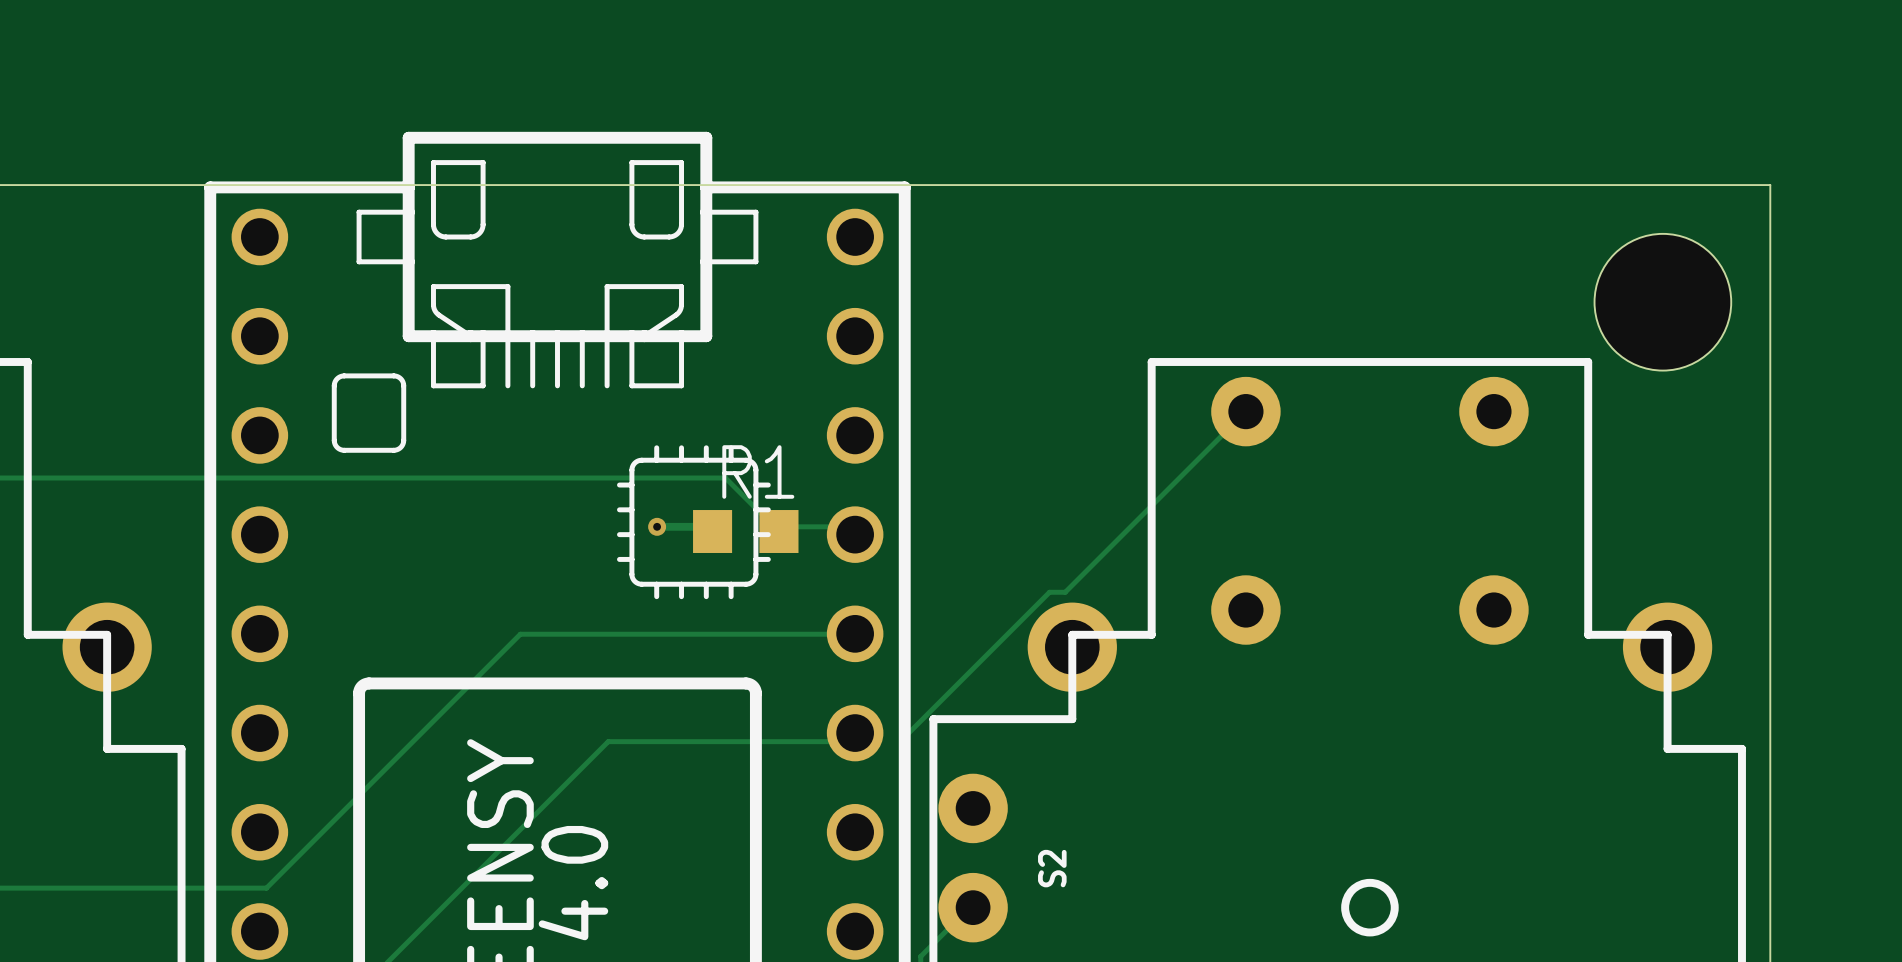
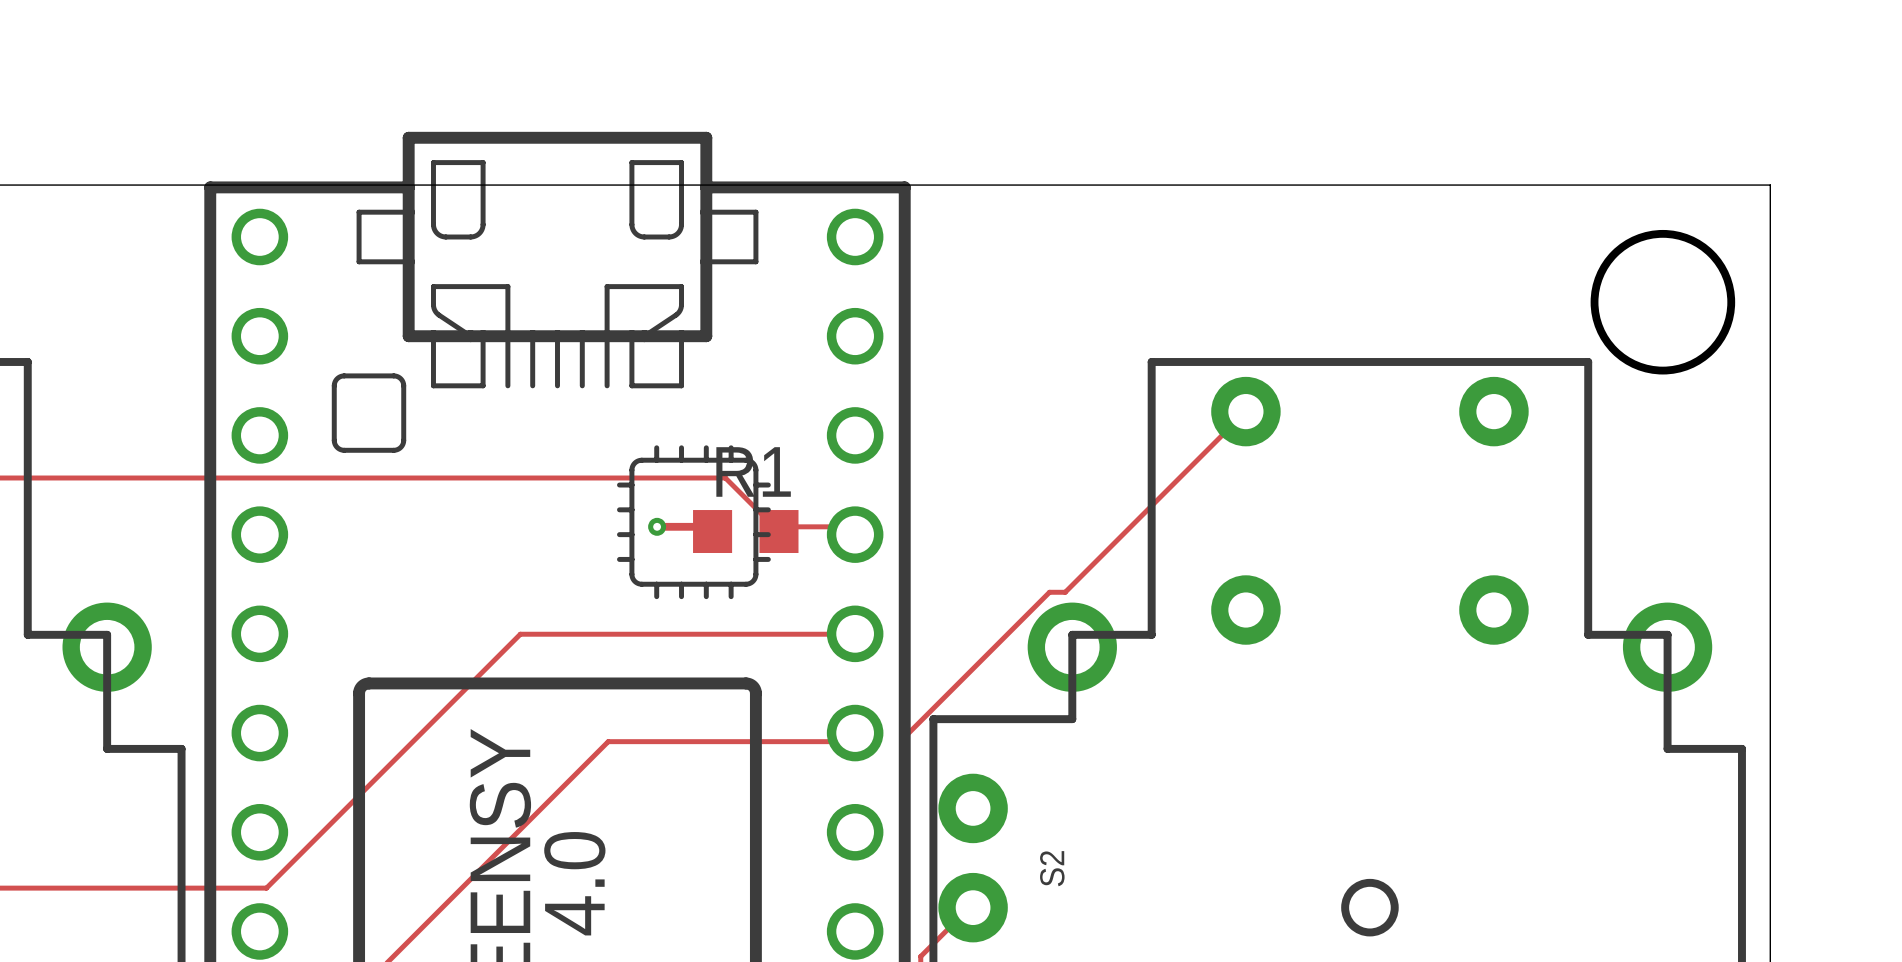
round board edge: none -> [1590, 229, 1736, 375]
hole: (1662, 302) -> none

